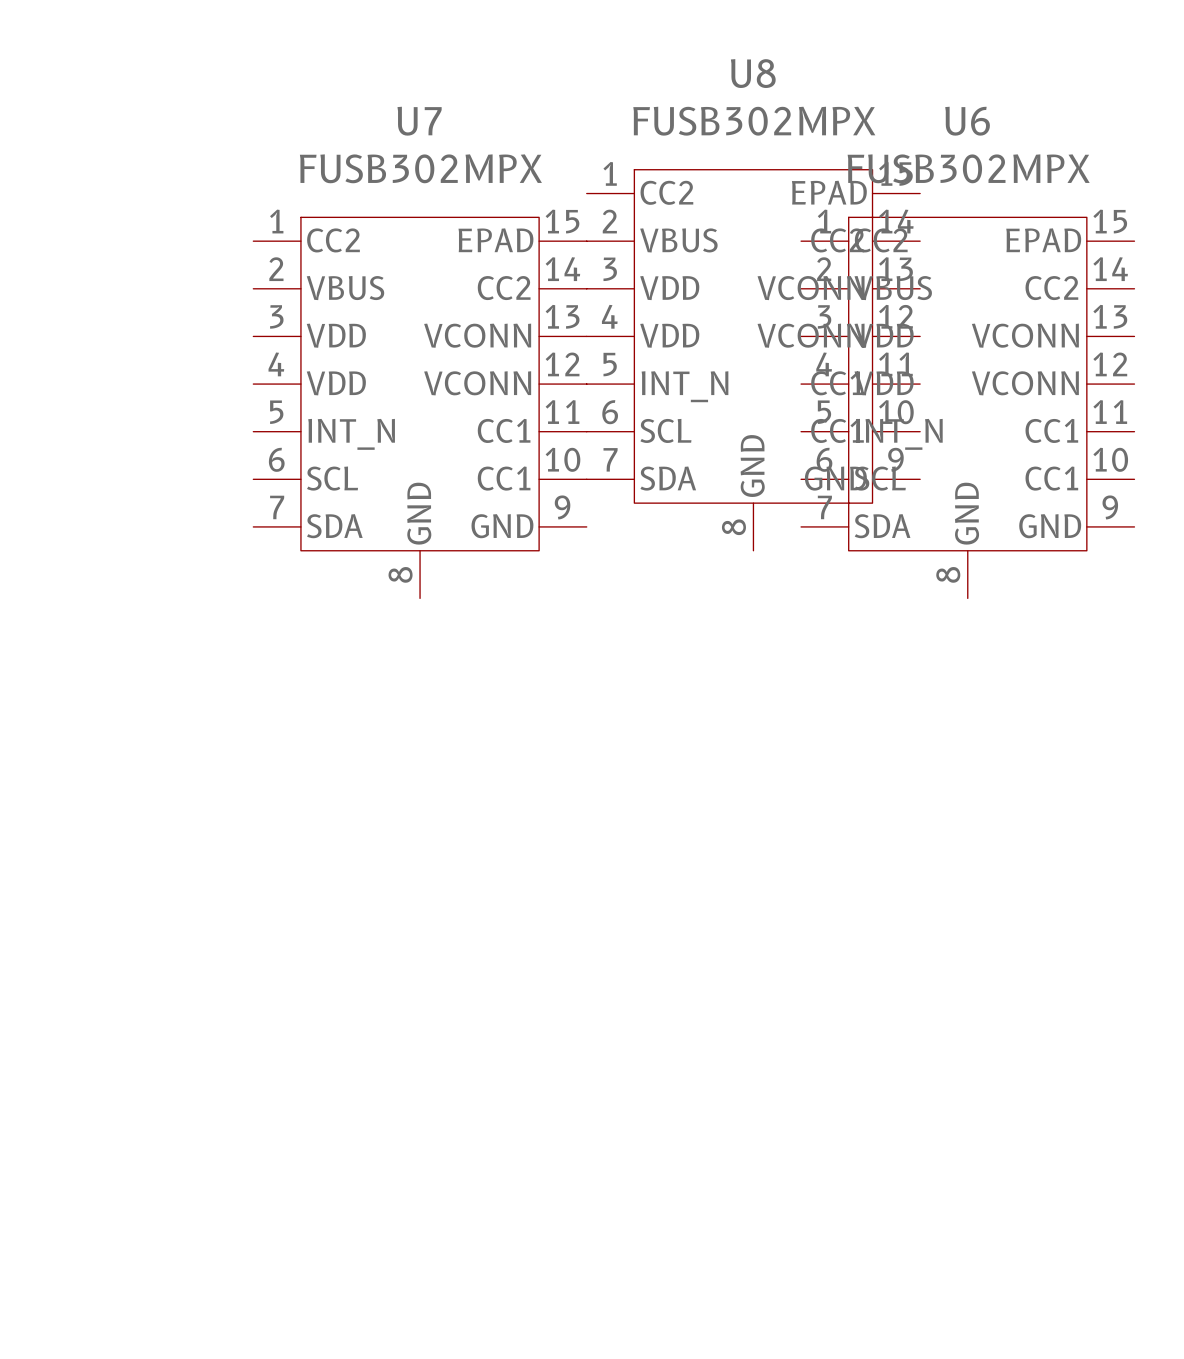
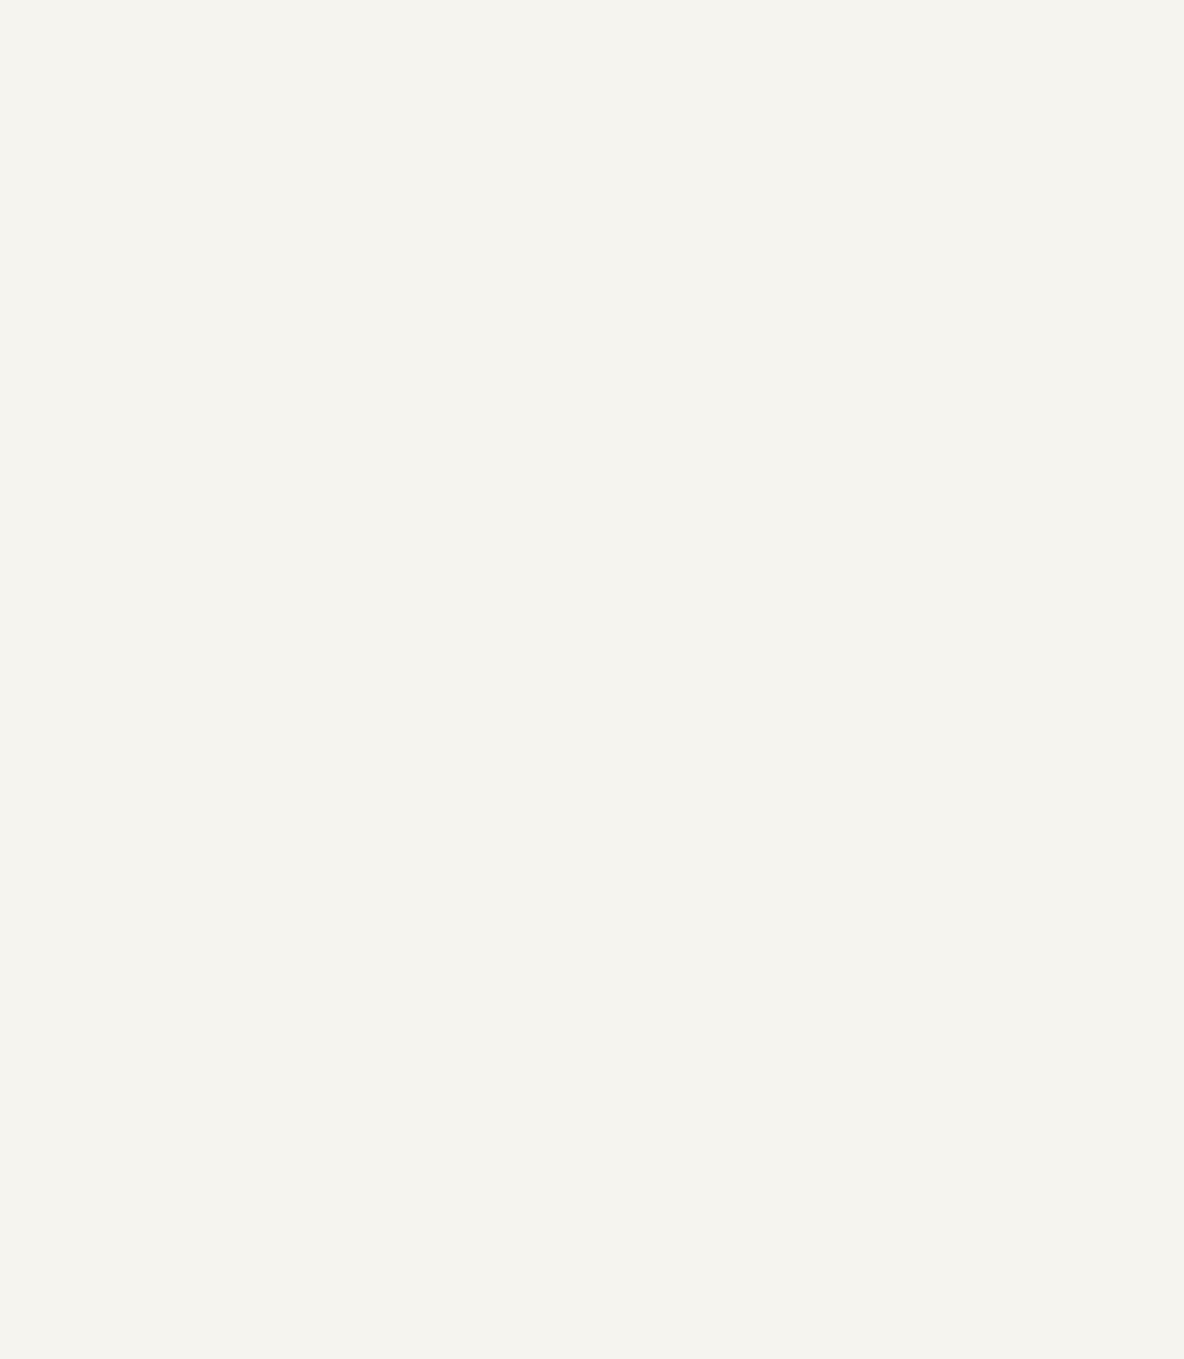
U8: FUSB302MPX (753, 360) -> none
U7: FUSB302MPX (420, 407) -> none
U6: FUSB302MPX (967, 407) -> none

